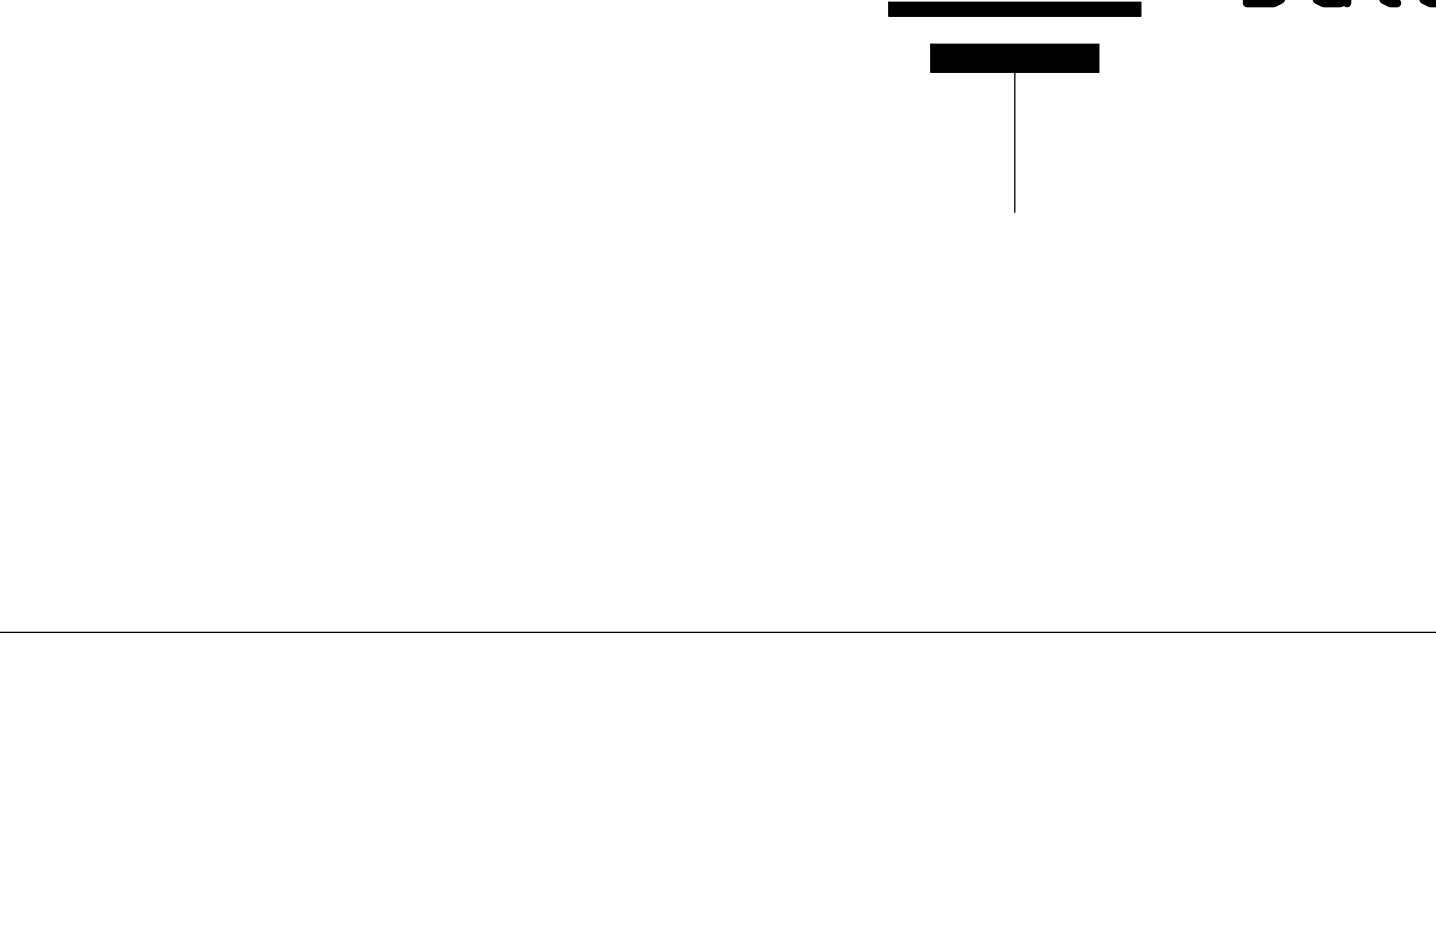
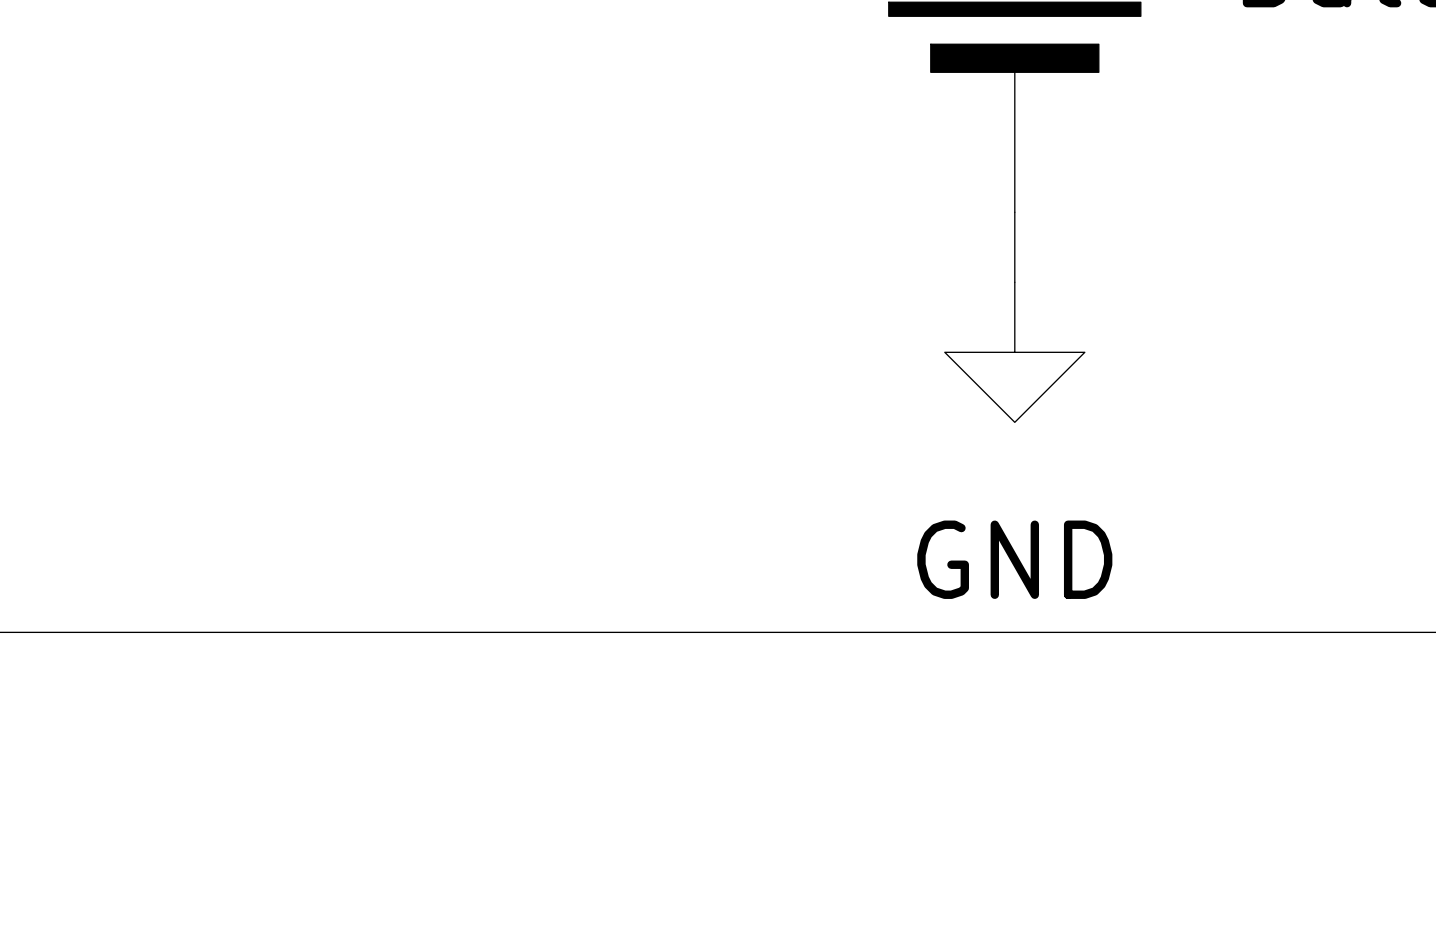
wire: none -> (1014, 212) (1014, 282)
power symbol: none -> GND (1014, 352)

